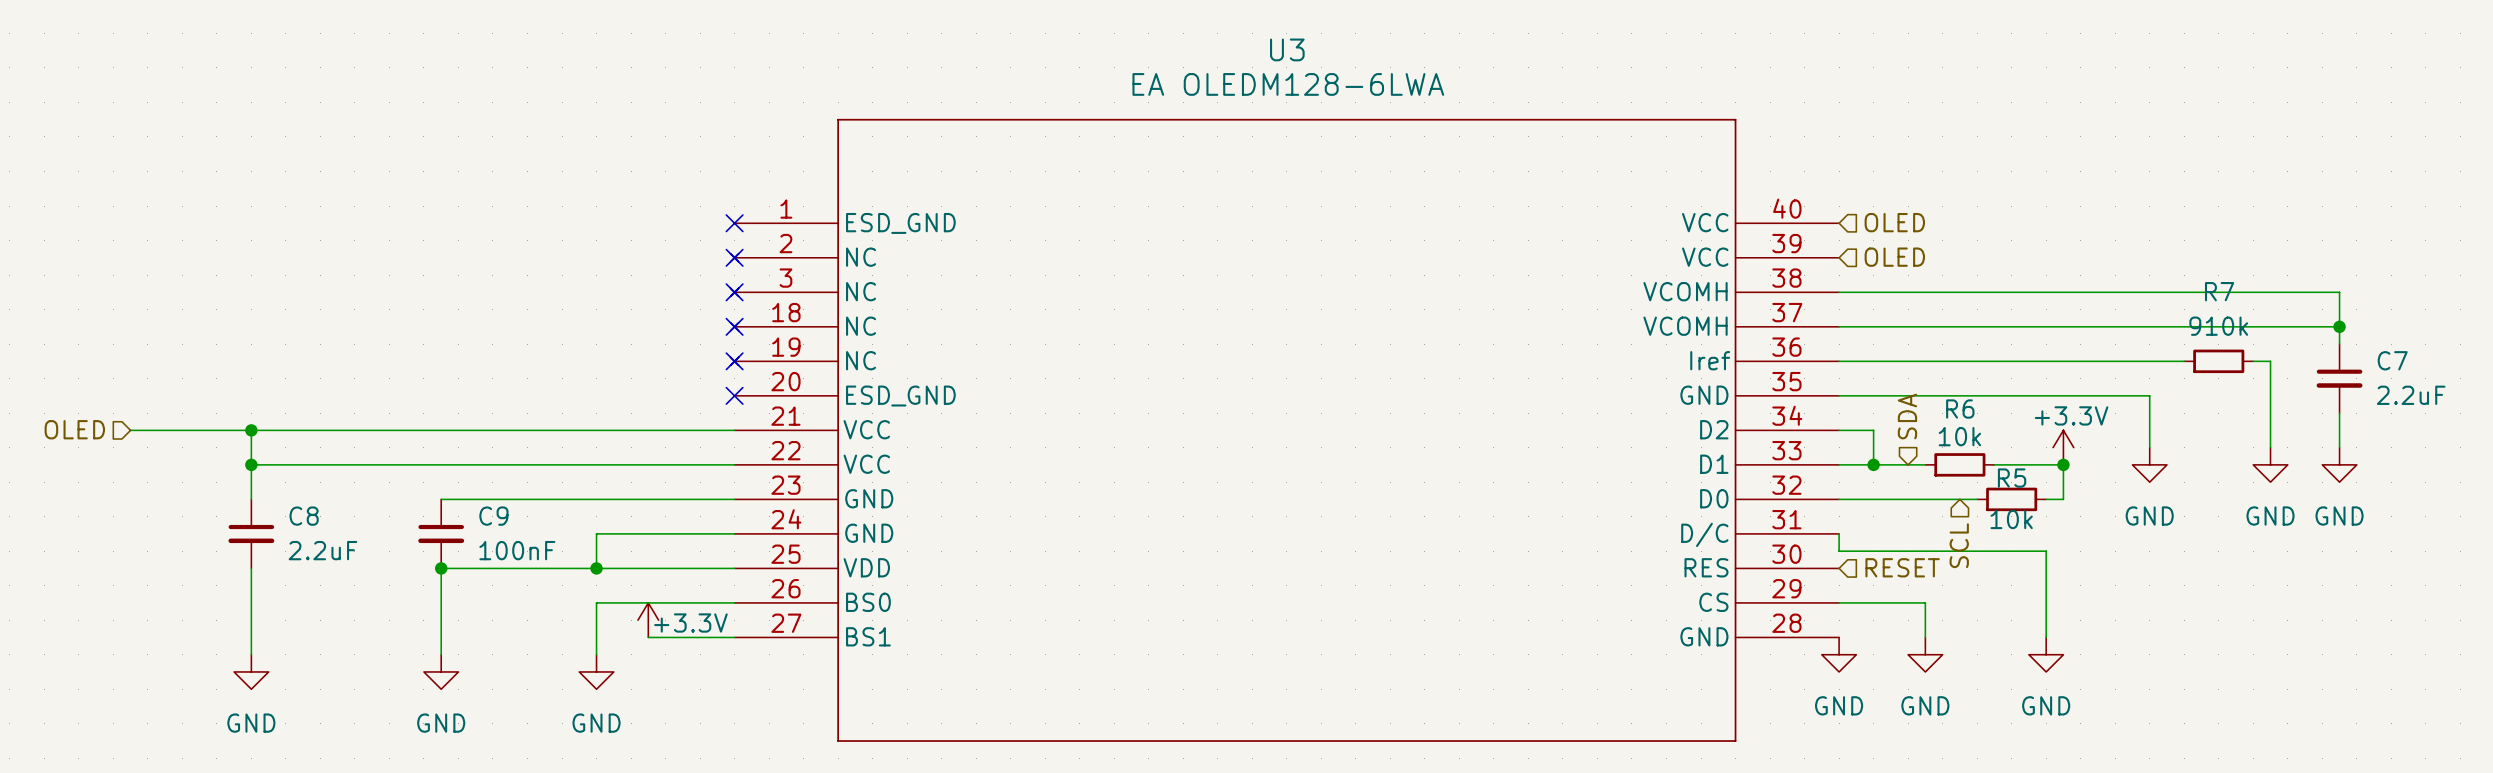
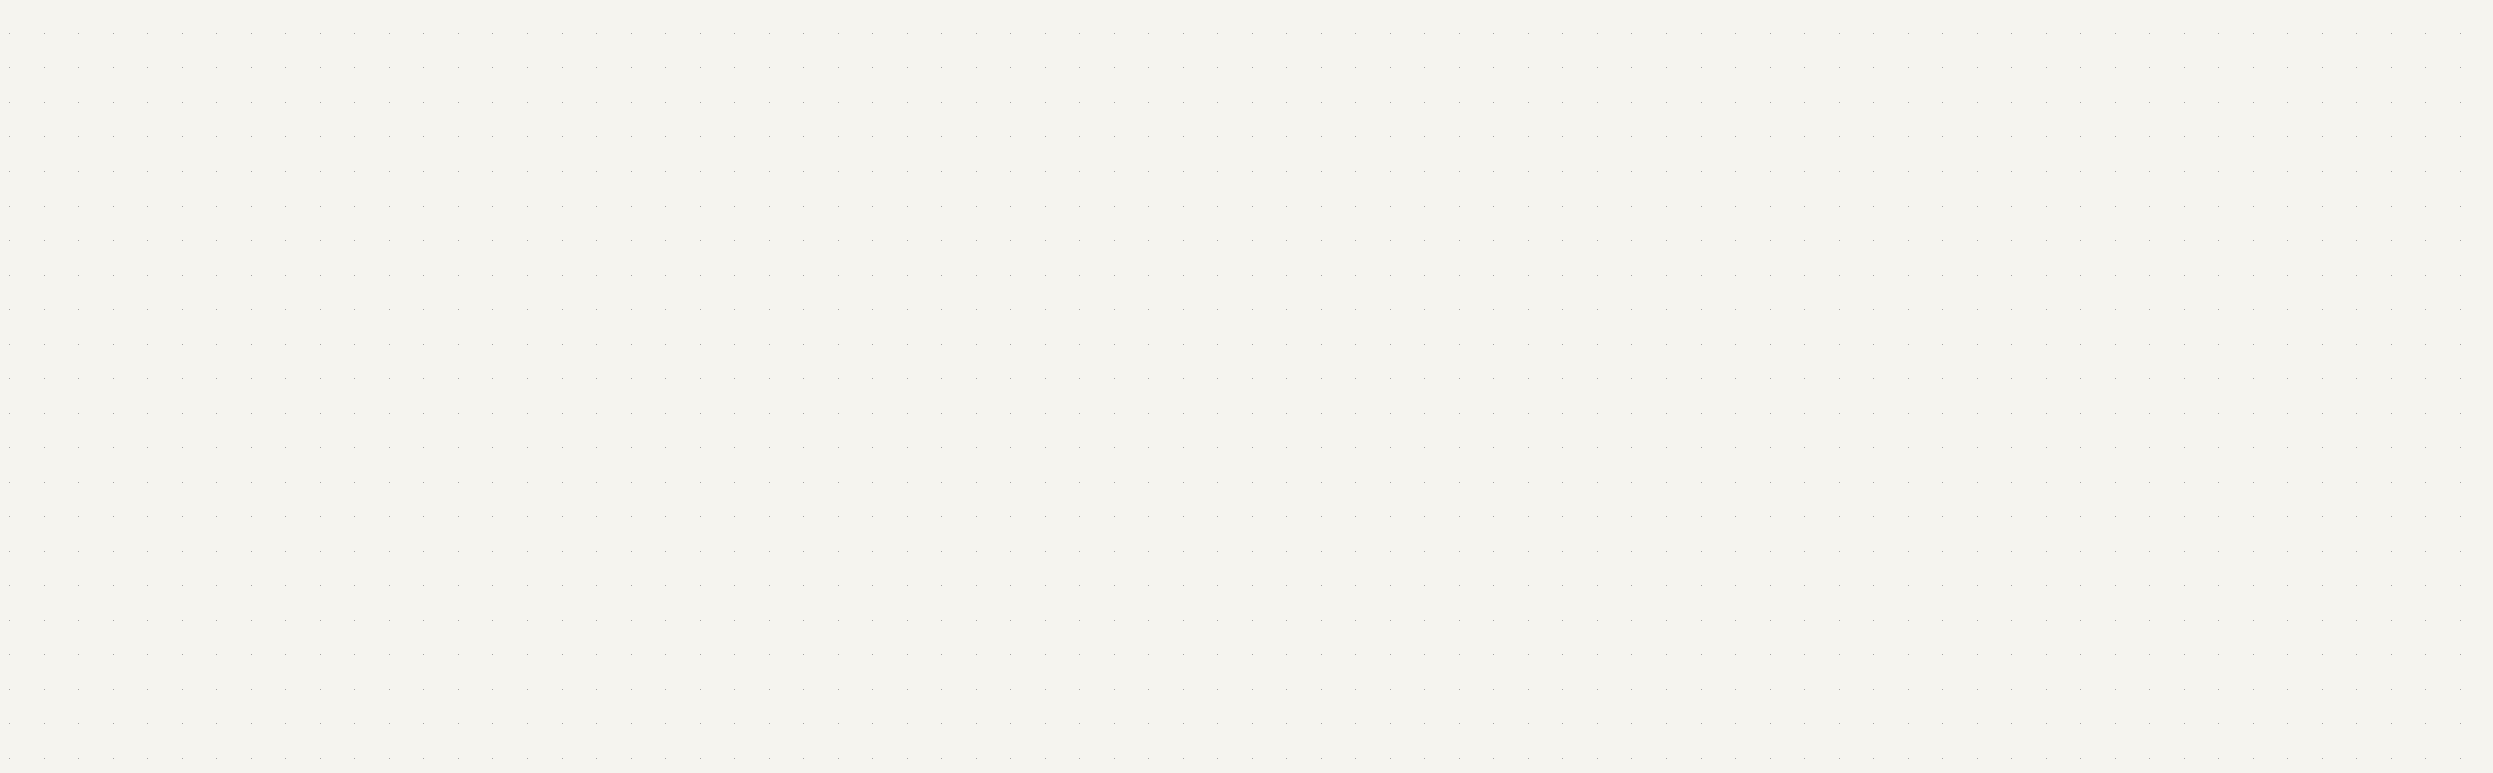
hierarchical label: OLED (1894, 222) -> none
no-connect mark: (734, 223) -> none
no-connect mark: (734, 257) -> none
hierarchical label: OLED (1894, 257) -> none
no-connect mark: (734, 292) -> none
wire: (1839, 292) (2339, 292) (2339, 344) -> none
no-connect mark: (734, 326) -> none
wire: (1839, 326) (2339, 326) -> none
junction: (2339, 326) -> none
no-connect mark: (734, 361) -> none
wire: (1839, 361) (2184, 361) -> none
R7: 910k (2218, 361) -> none
wire: (2253, 361) (2270, 361) (2270, 447) -> none
C7: 2.2uF (2339, 378) -> none
no-connect mark: (734, 395) -> none
wire: (1839, 395) (2149, 395) (2149, 447) -> none
wire: (2339, 413) (2339, 447) -> none
hierarchical label: SDA (1907, 416) -> none
hierarchical label: OLED (74, 429) -> none
wire: (130, 430) (734, 430) -> none
wire: (251, 430) (251, 499) -> none
junction: (251, 430) -> none
U3: EA OLEDM128-6LWA (1284, 430) -> none
wire: (1839, 430) (1873, 430) (1873, 464) -> none
power symbol: +3.3V (2063, 447) -> none
wire: (251, 464) (734, 464) -> none
junction: (251, 464) -> none
wire: (1839, 464) (1925, 464) -> none
junction: (1873, 464) -> none
R6: 10k (1959, 464) -> none
wire: (1994, 464) (2063, 464) (2063, 499) (2046, 499) -> none
junction: (2063, 464) -> none
power symbol: GND (2149, 464) -> none
power symbol: GND (2270, 464) -> none
power symbol: GND (2339, 464) -> none
wire: (441, 499) (734, 499) -> none
wire: (1839, 499) (1977, 499) -> none
R5: 10k (2011, 499) -> none
C8: 2.2uF (251, 533) -> none
C9: 100nF (441, 533) -> none
wire: (734, 533) (596, 533) (596, 568) -> none
wire: (1839, 533) (1839, 551) (2046, 551) (2046, 637) -> none
hierarchical label: SCL (1959, 545) -> none
hierarchical label: RESET (1902, 567) -> none
wire: (251, 568) (251, 654) -> none
junction: (441, 568) -> none
junction: (596, 568) -> none
wire: (734, 568) (441, 568) (441, 654) -> none
wire: (734, 602) (596, 602) (596, 654) -> none
wire: (1839, 602) (1925, 602) (1925, 637) -> none
power symbol: +3.3V (648, 620) -> none
wire: (648, 637) (734, 637) -> none
power symbol: GND (1839, 654) -> none
power symbol: GND (1925, 654) -> none
power symbol: GND (2046, 654) -> none
power symbol: GND (251, 671) -> none
power symbol: GND (441, 671) -> none
power symbol: GND (596, 671) -> none

